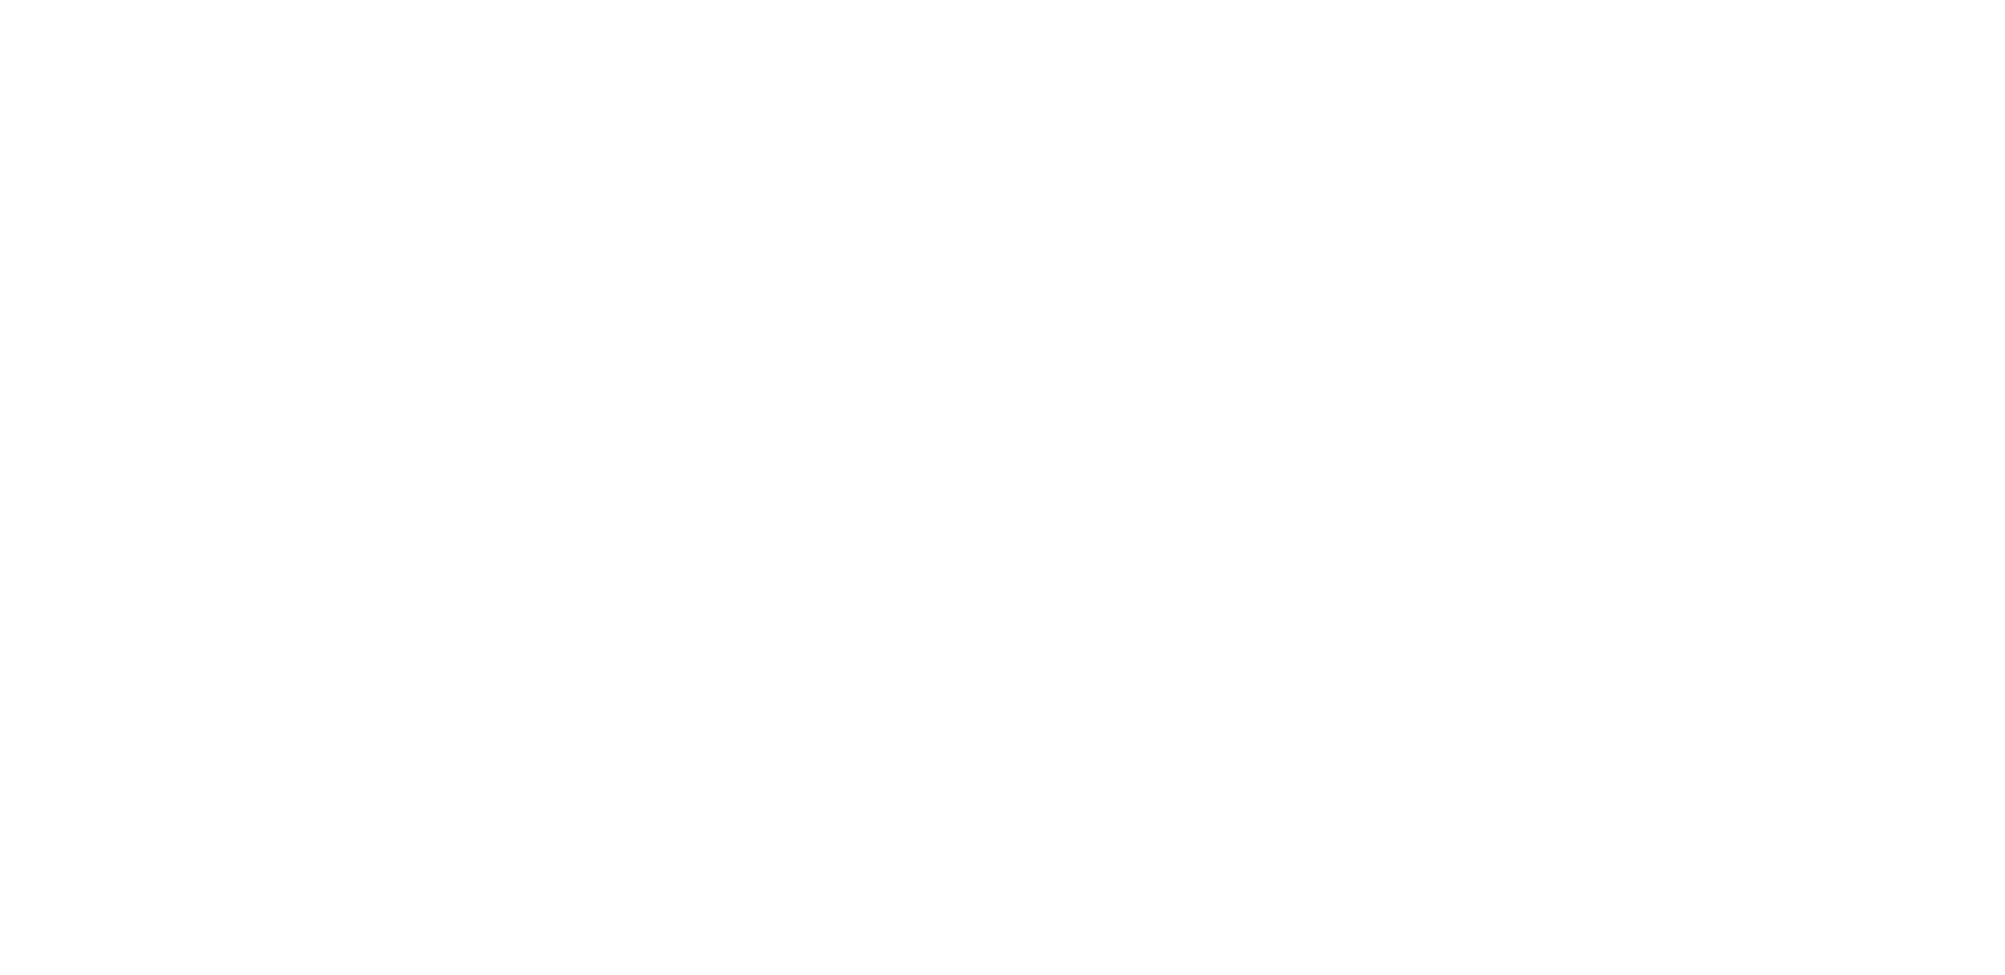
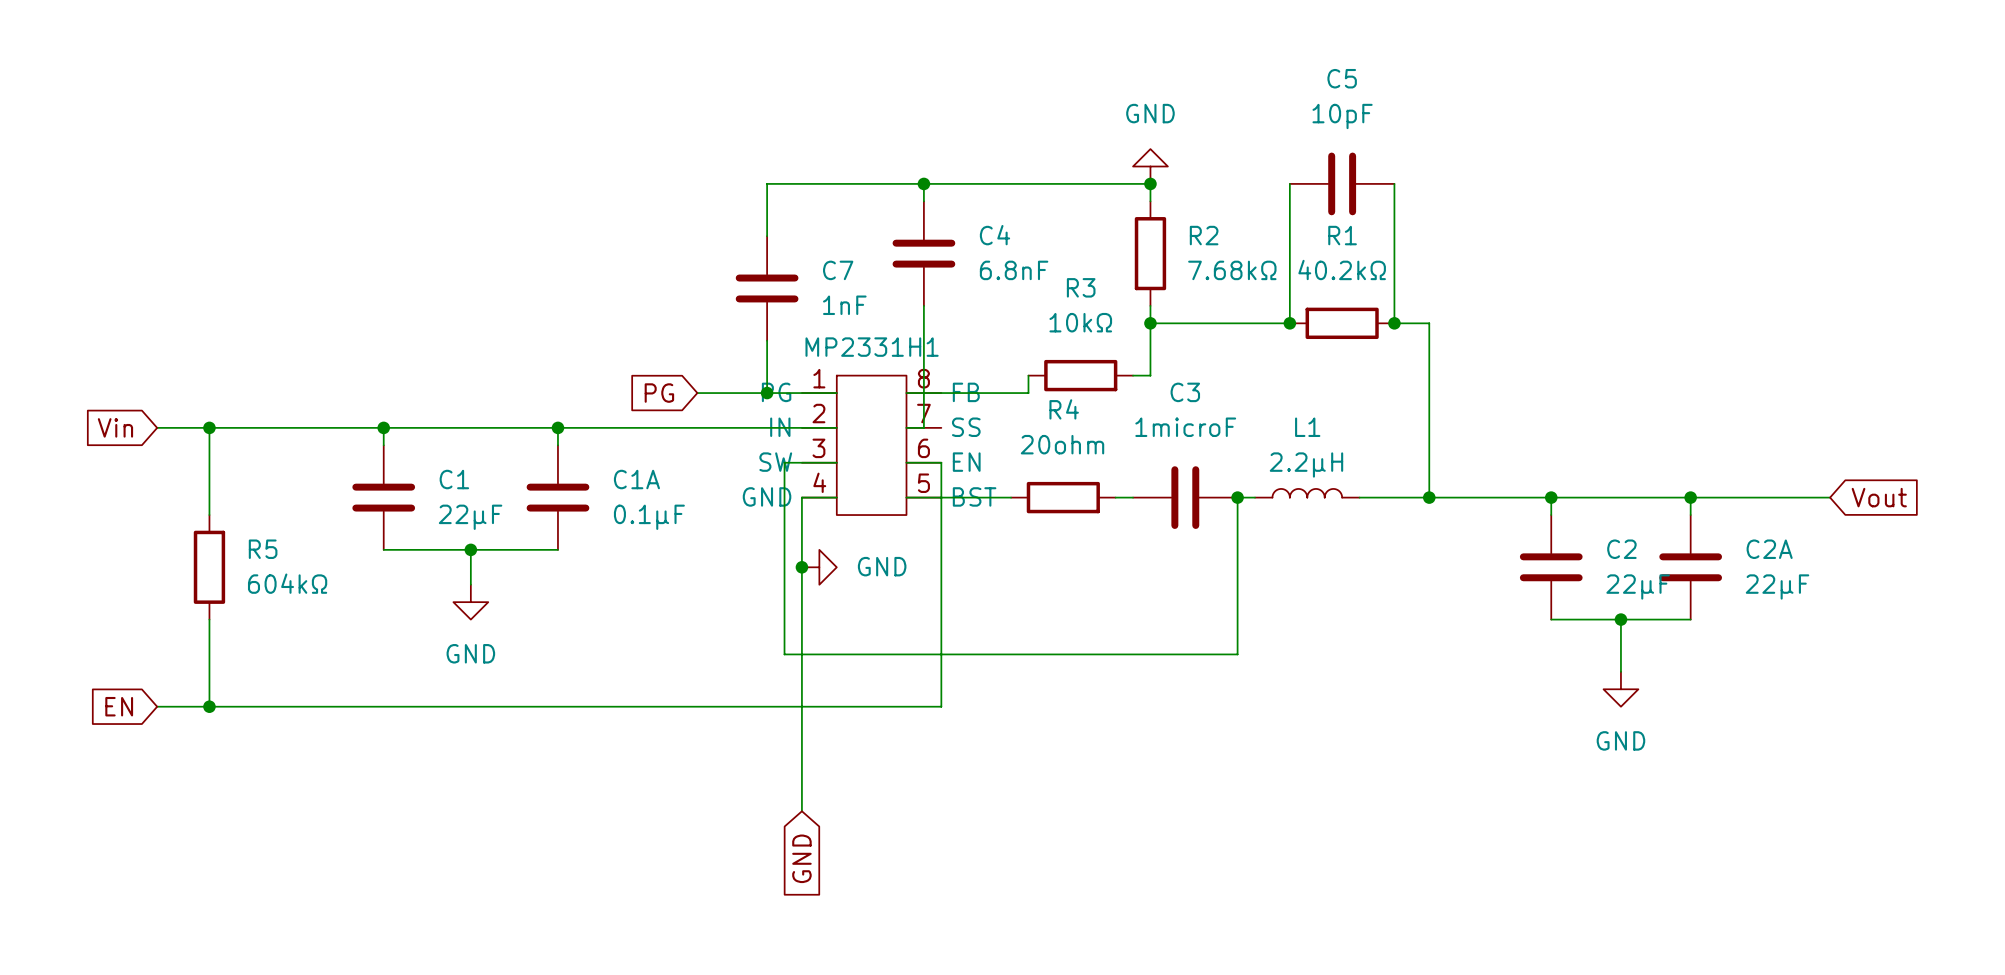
power symbol: none -> GND (1150, 166)
wire: none -> (923, 183) (923, 201)
junction: none -> (923, 183)
junction: none -> (1150, 183)
wire: none -> (1289, 183) (1289, 323) (1150, 323)
C5: none -> 10pF (1342, 183)
wire: none -> (1394, 183) (1394, 323) (1429, 323) (1429, 497)
wire: none -> (1150, 201) (1150, 183) (767, 183) (767, 236)
C4: none -> 6.8nF (923, 253)
R2: none -> 7.68kΩ (1150, 253)
C7: none -> 1nF (767, 288)
wire: none -> (923, 305) (923, 427) (906, 427)
wire: none -> (1150, 305) (1150, 375) (1133, 375)
junction: none -> (1150, 323)
junction: none -> (1289, 323)
R1: none -> 40.2kΩ (1342, 323)
junction: none -> (1394, 323)
wire: none -> (767, 340) (767, 393)
wire: none -> (1028, 375) (1028, 393) (906, 393)
R3: none -> 10kΩ (1080, 375)
global label: none -> PG (659, 393)
wire: none -> (697, 393) (836, 393)
junction: none -> (767, 393)
global label: none -> Vin (115, 427)
wire: none -> (157, 427) (836, 427)
wire: none -> (209, 427) (209, 515)
junction: none -> (209, 427)
wire: none -> (383, 427) (383, 445)
junction: none -> (383, 427)
wire: none -> (557, 427) (557, 445)
junction: none -> (557, 427)
MP2331H1: none -> (871, 445)
wire: none -> (836, 462) (784, 462) (784, 654) (1237, 654) (1237, 497) (1255, 497)
wire: none -> (906, 462) (941, 462) (941, 706) (157, 706)
L1: none -> 2.2µH (1307, 493)
C1: none -> 22µF (383, 497)
C1A: none -> 0.1µF (557, 497)
wire: none -> (836, 497) (801, 497) (801, 811)
wire: none -> (906, 497) (1011, 497)
R4: none -> 20ohm (1063, 497)
wire: none -> (1115, 497) (1133, 497)
C3: none -> 1microF (1185, 497)
junction: none -> (1237, 497)
wire: none -> (1359, 497) (1830, 497)
junction: none -> (1429, 497)
wire: none -> (1551, 497) (1551, 515)
junction: none -> (1551, 497)
wire: none -> (1690, 497) (1690, 515)
junction: none -> (1690, 497)
global label: none -> Vout (1879, 497)
wire: none -> (383, 549) (557, 549)
wire: none -> (470, 549) (470, 584)
junction: none -> (470, 549)
R5: none -> 604kΩ (209, 567)
junction: none -> (801, 567)
power symbol: none -> GND (819, 567)
C2: none -> 22µF (1551, 567)
C2A: none -> 22µF (1690, 567)
power symbol: none -> GND (470, 602)
wire: none -> (209, 619) (209, 706)
wire: none -> (1551, 619) (1690, 619)
wire: none -> (1620, 619) (1620, 671)
junction: none -> (1620, 619)
power symbol: none -> GND (1620, 689)
global label: none -> EN (119, 706)
junction: none -> (209, 706)
global label: none -> GND (801, 858)

